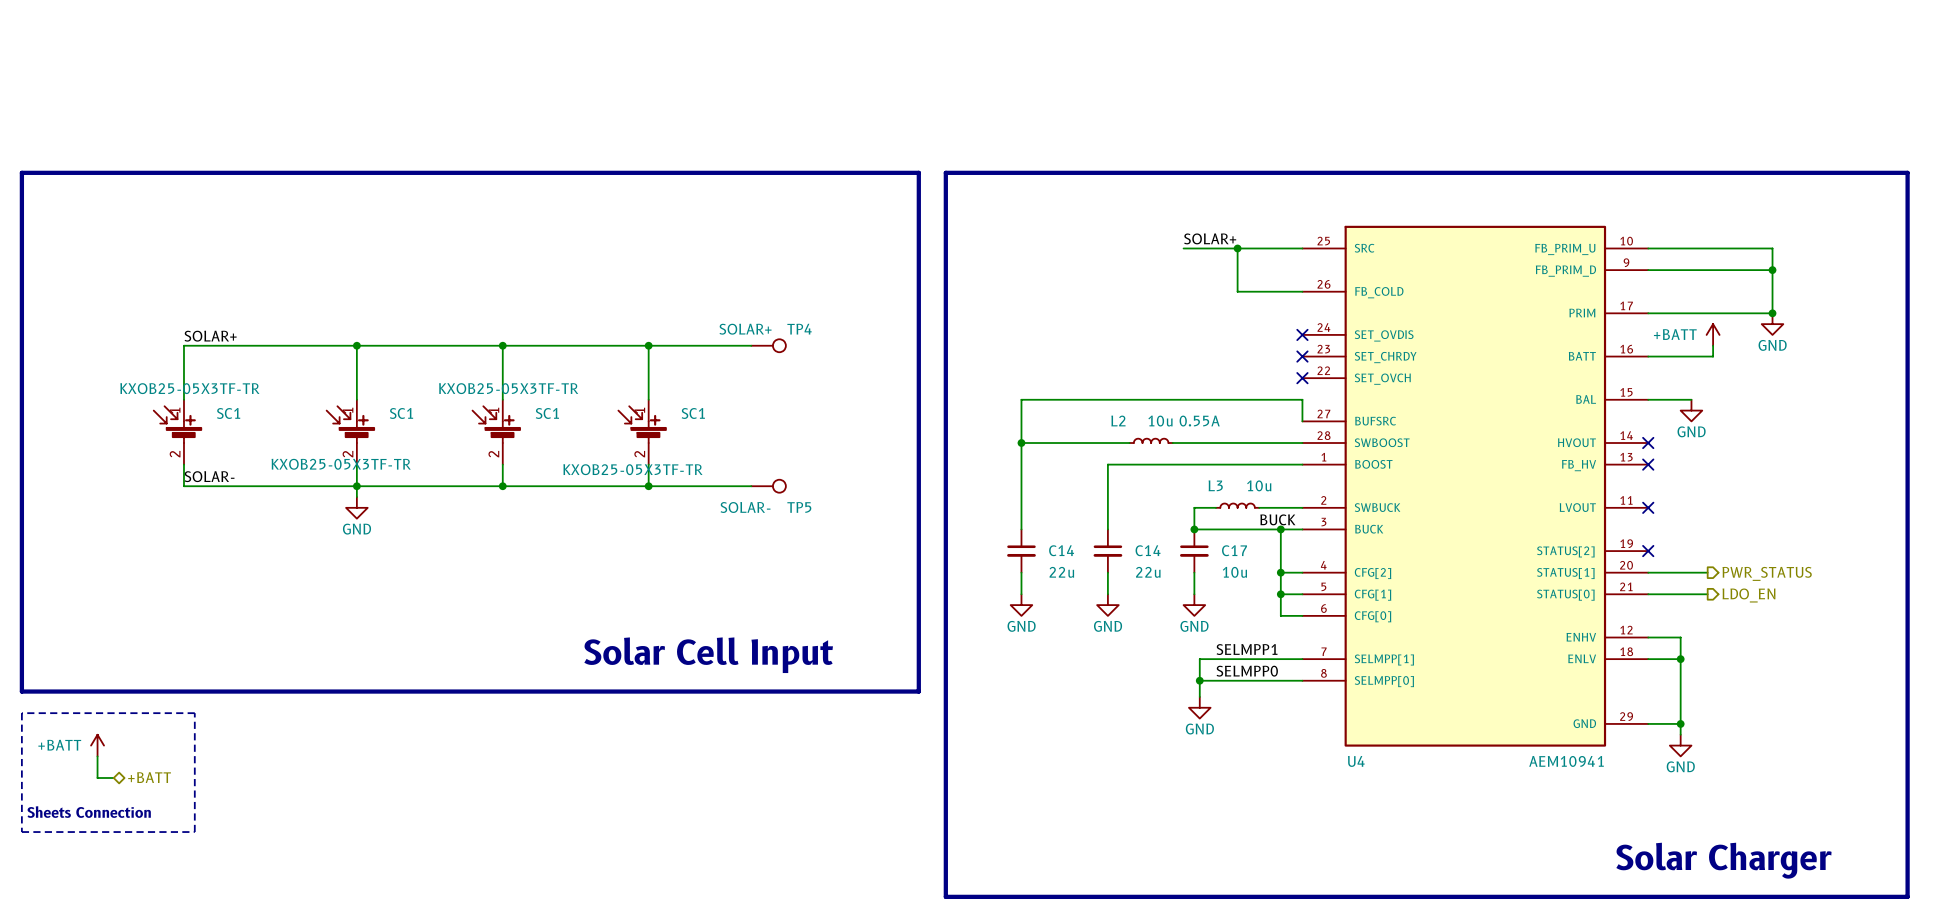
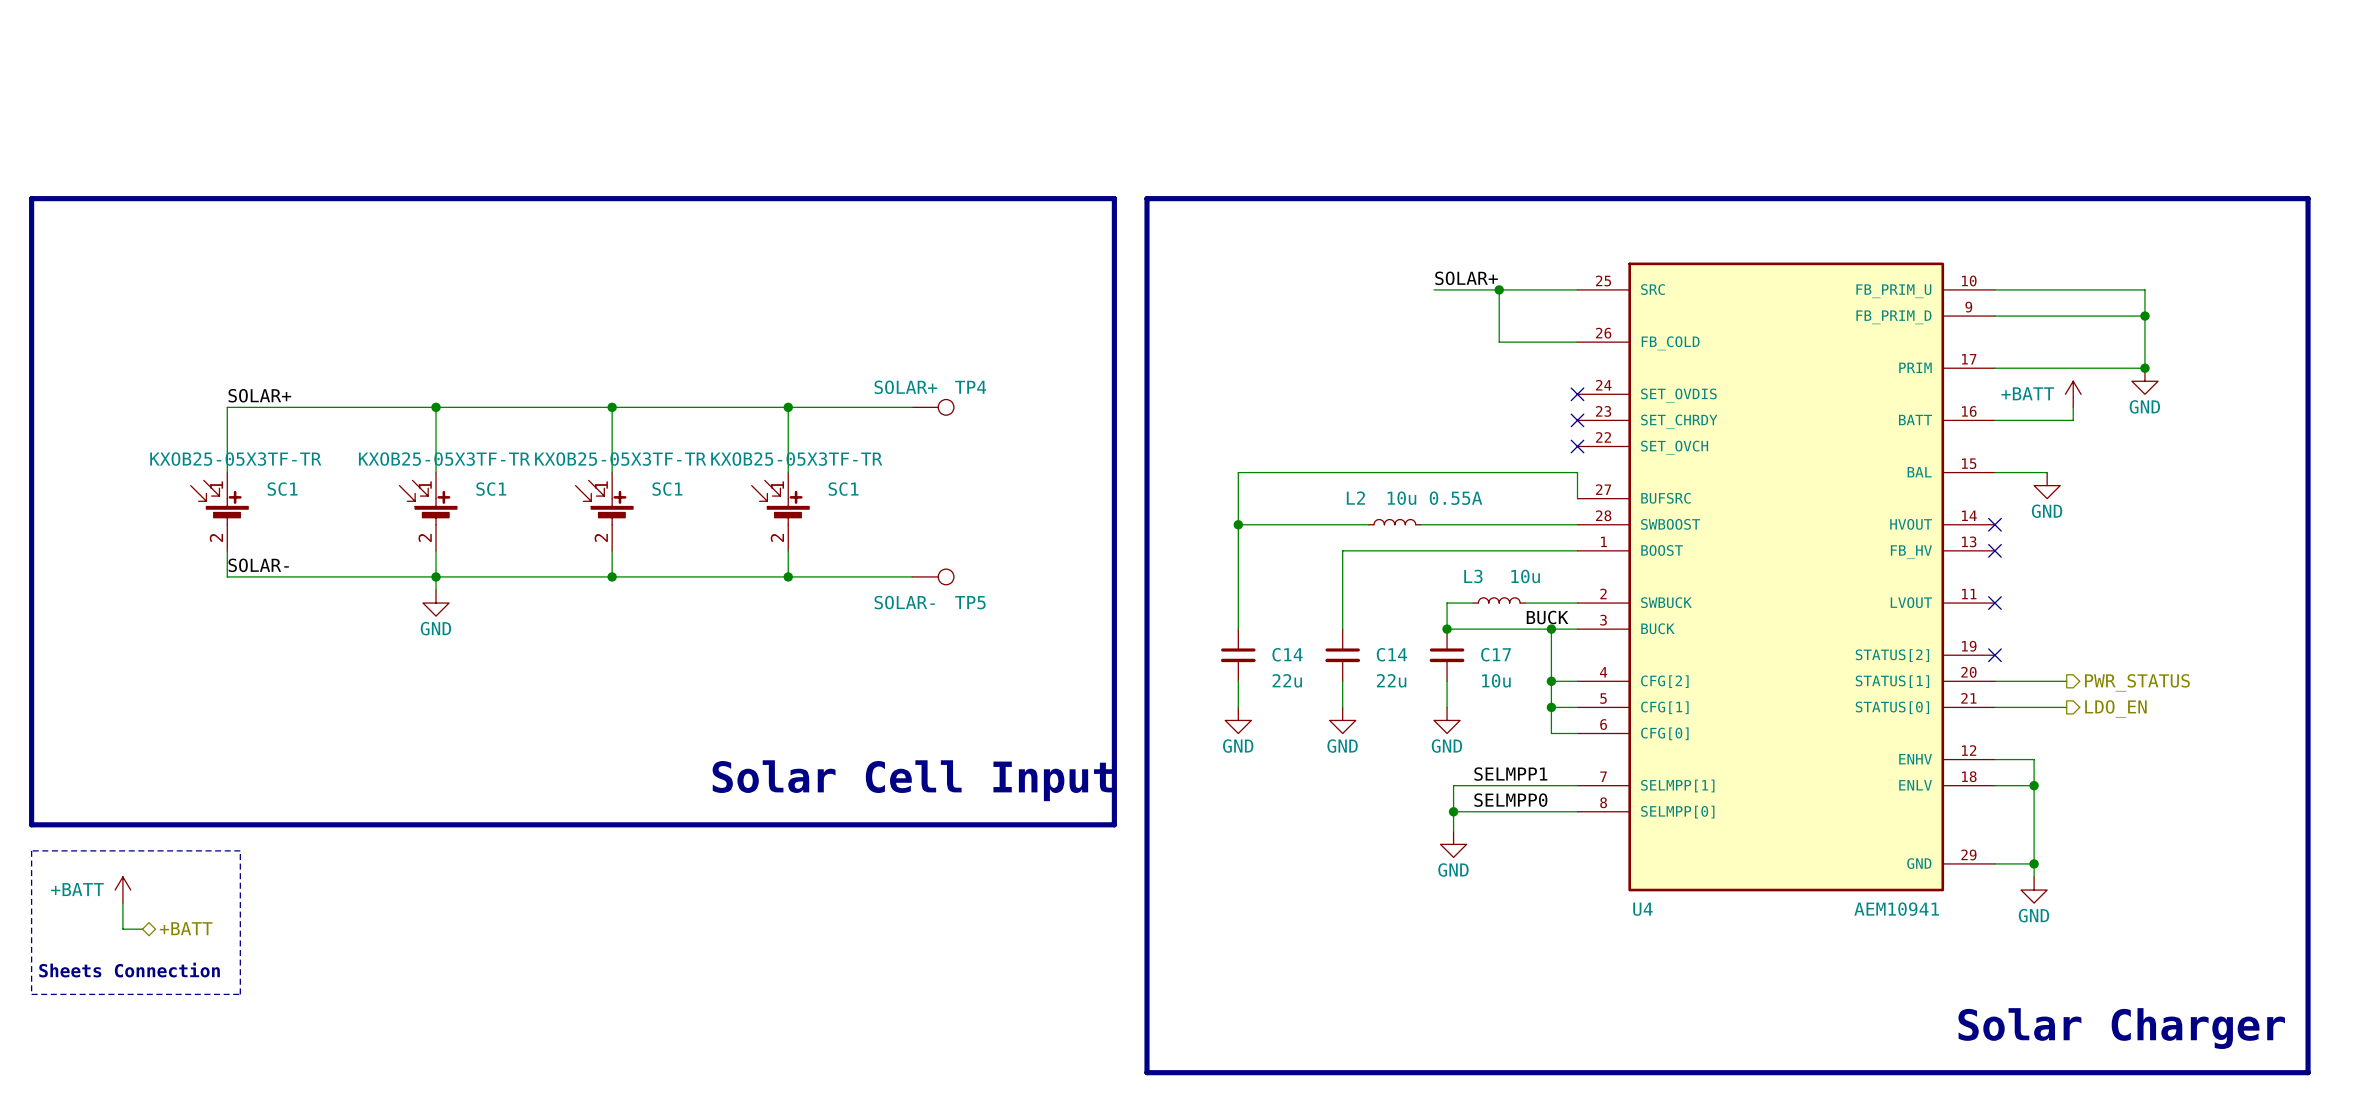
SC1 value position: KXOB25-05X3TF-TR (341, 464) -> KXOB25-05X3TF-TR (444, 459)
SC1 value position: KXOB25-05X3TF-TR (632, 469) -> KXOB25-05X3TF-TR (796, 459)

